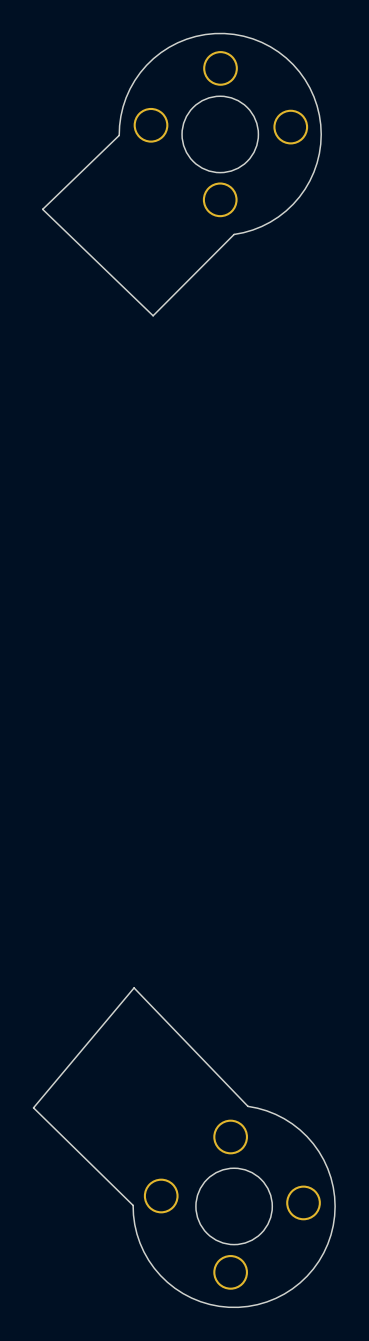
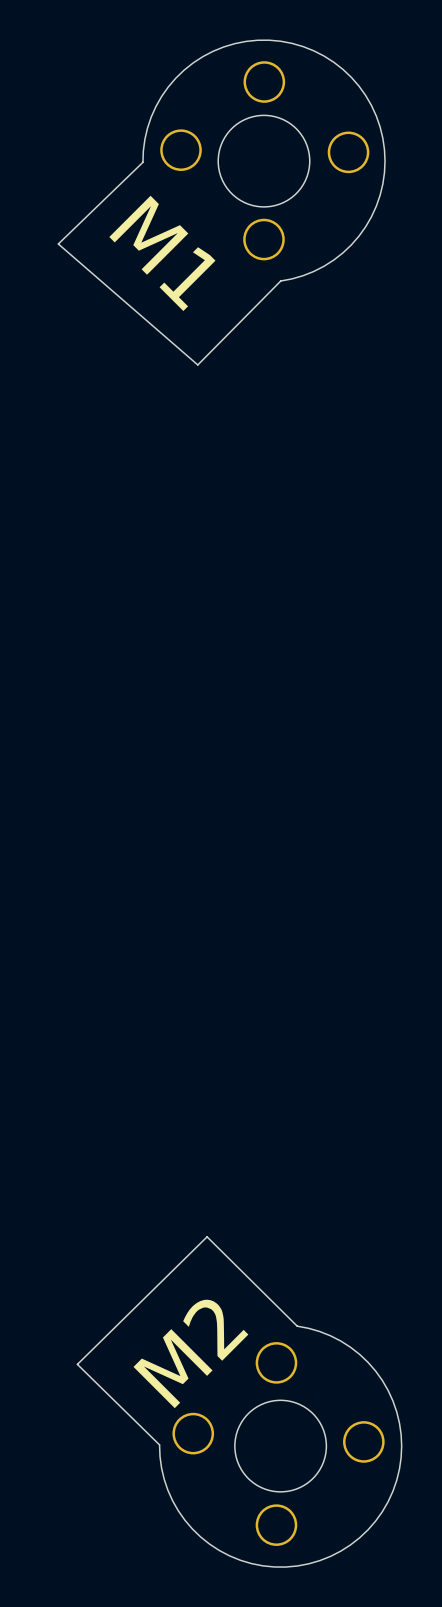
board edge: (48, 203) (42, 209) (153, 315) (234, 234) -> (58, 244) (197, 364) (280, 281)
text: none -> M1 (162, 253)
board edge: (247, 1106) (134, 987) (33, 1107) (64, 1138) -> (297, 1326) (207, 1236) (77, 1364)
text: none -> M2 (190, 1353)

